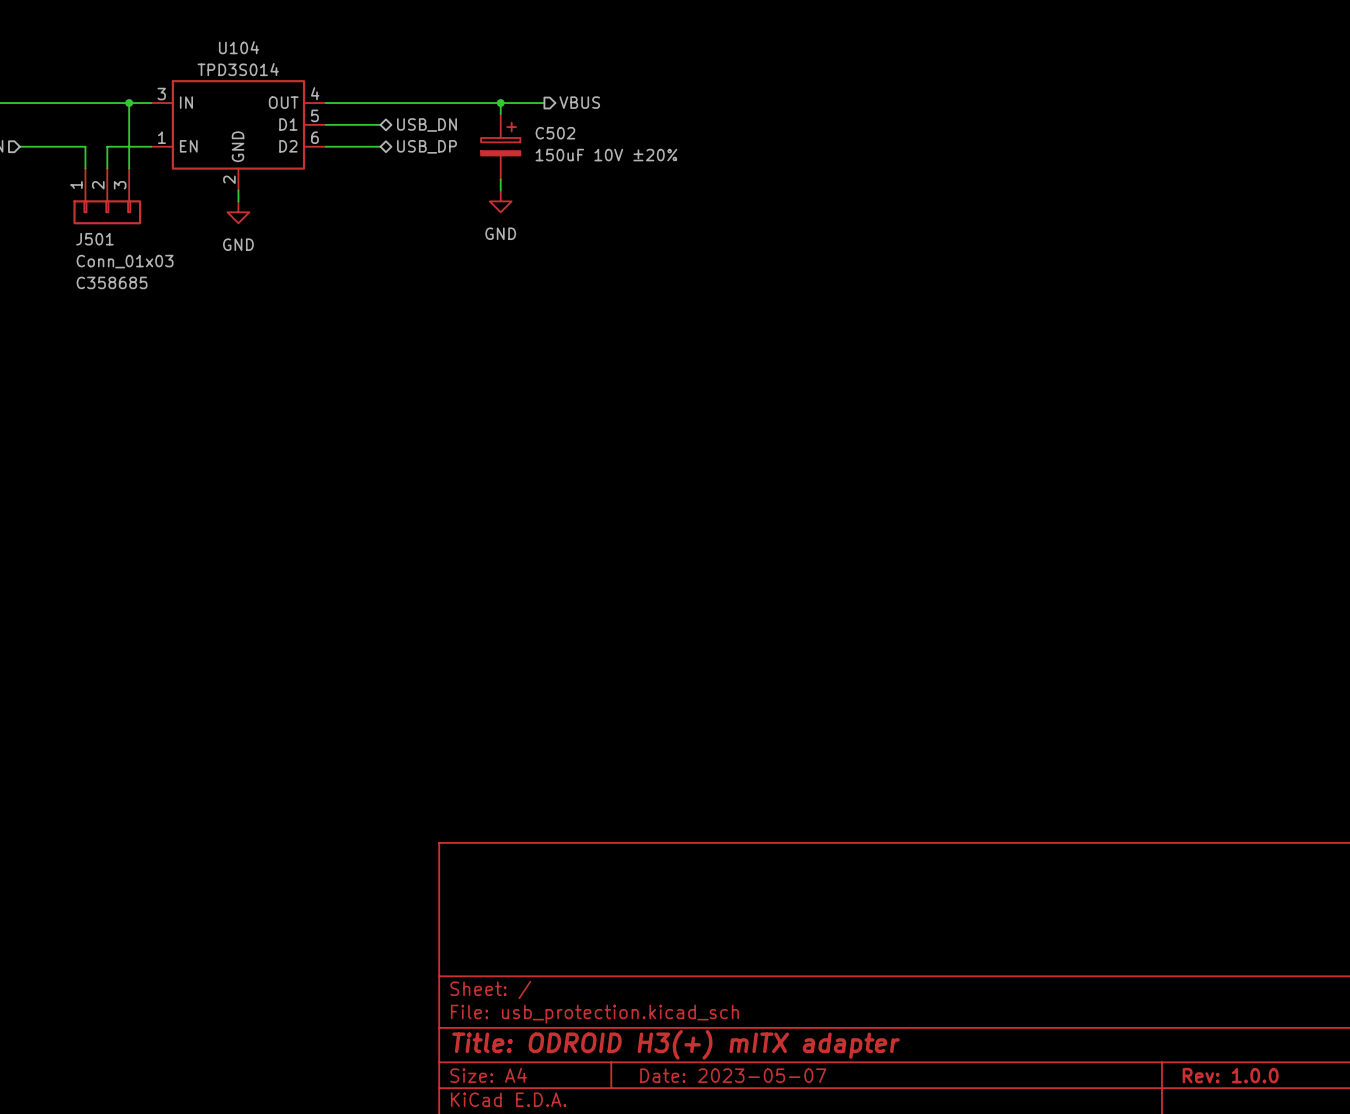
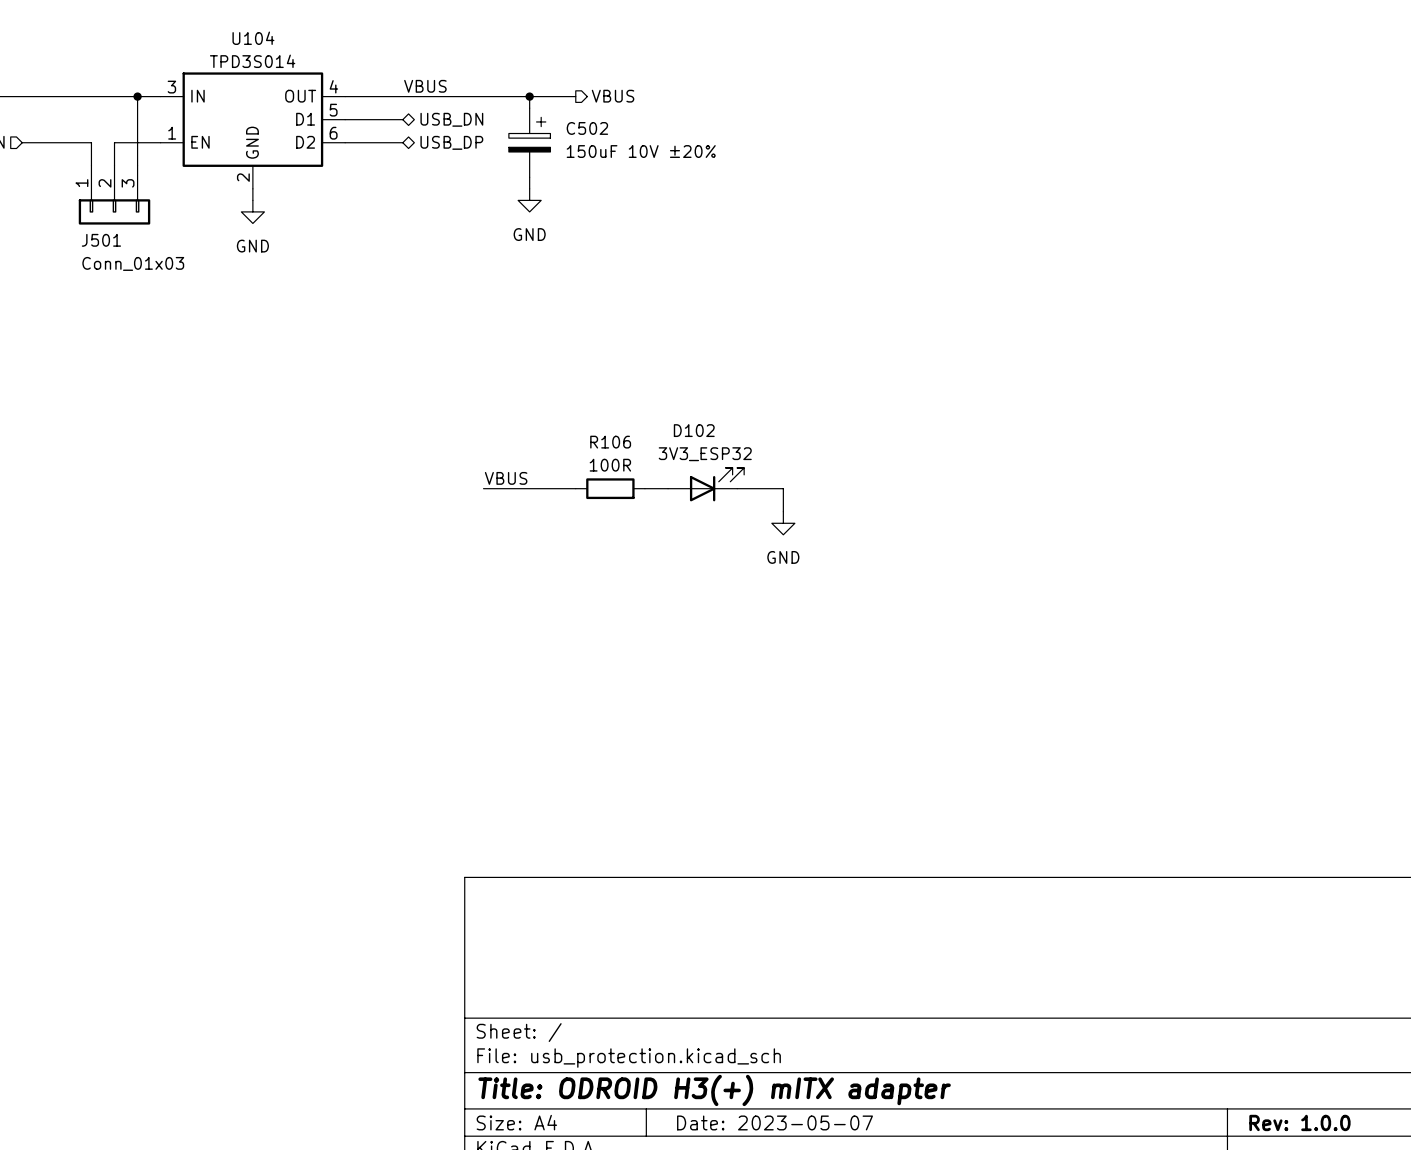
label: none -> VBUS (425, 86)
J501 text: C358685 (112, 282) -> none
label: none -> VBUS (506, 478)
D102: none -> 3V3_ESP32 (706, 484)
wire: none -> (483, 488) (575, 488)
R106: none -> 100R (610, 488)
wire: none -> (644, 488) (668, 488)
wire: none -> (737, 488) (783, 488) (783, 511)
power symbol: none -> GND (783, 523)

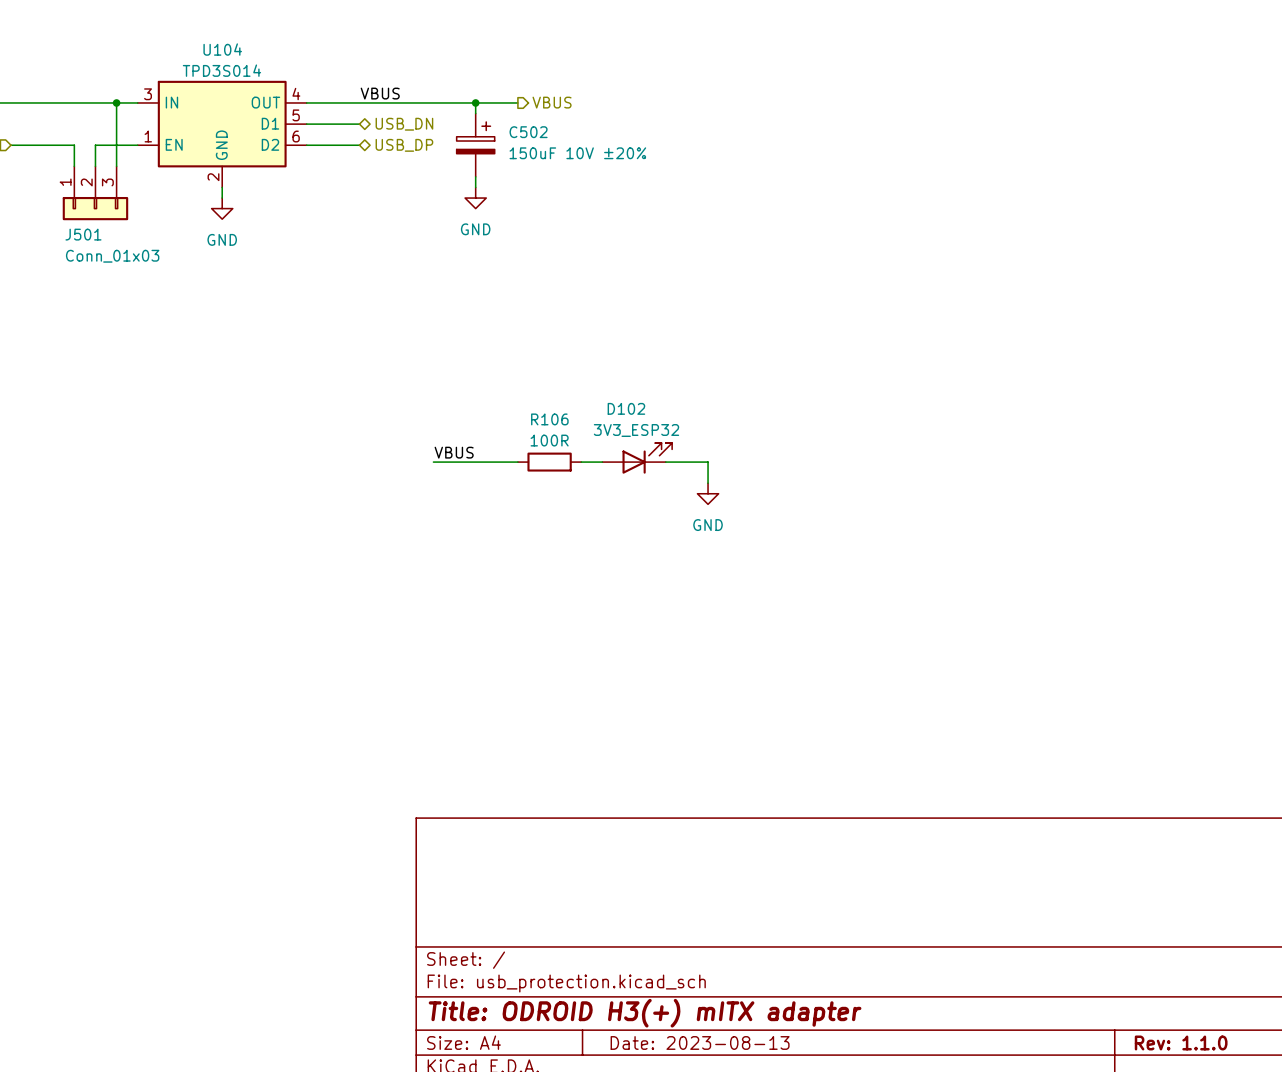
title block: Date: 2023-05-07 (775, 1122) -> Date: 2023-08-13 (700, 1042)
title block: Rev: 1.0.0 (1299, 1122) -> Rev: 1.1.0 (1181, 1042)

